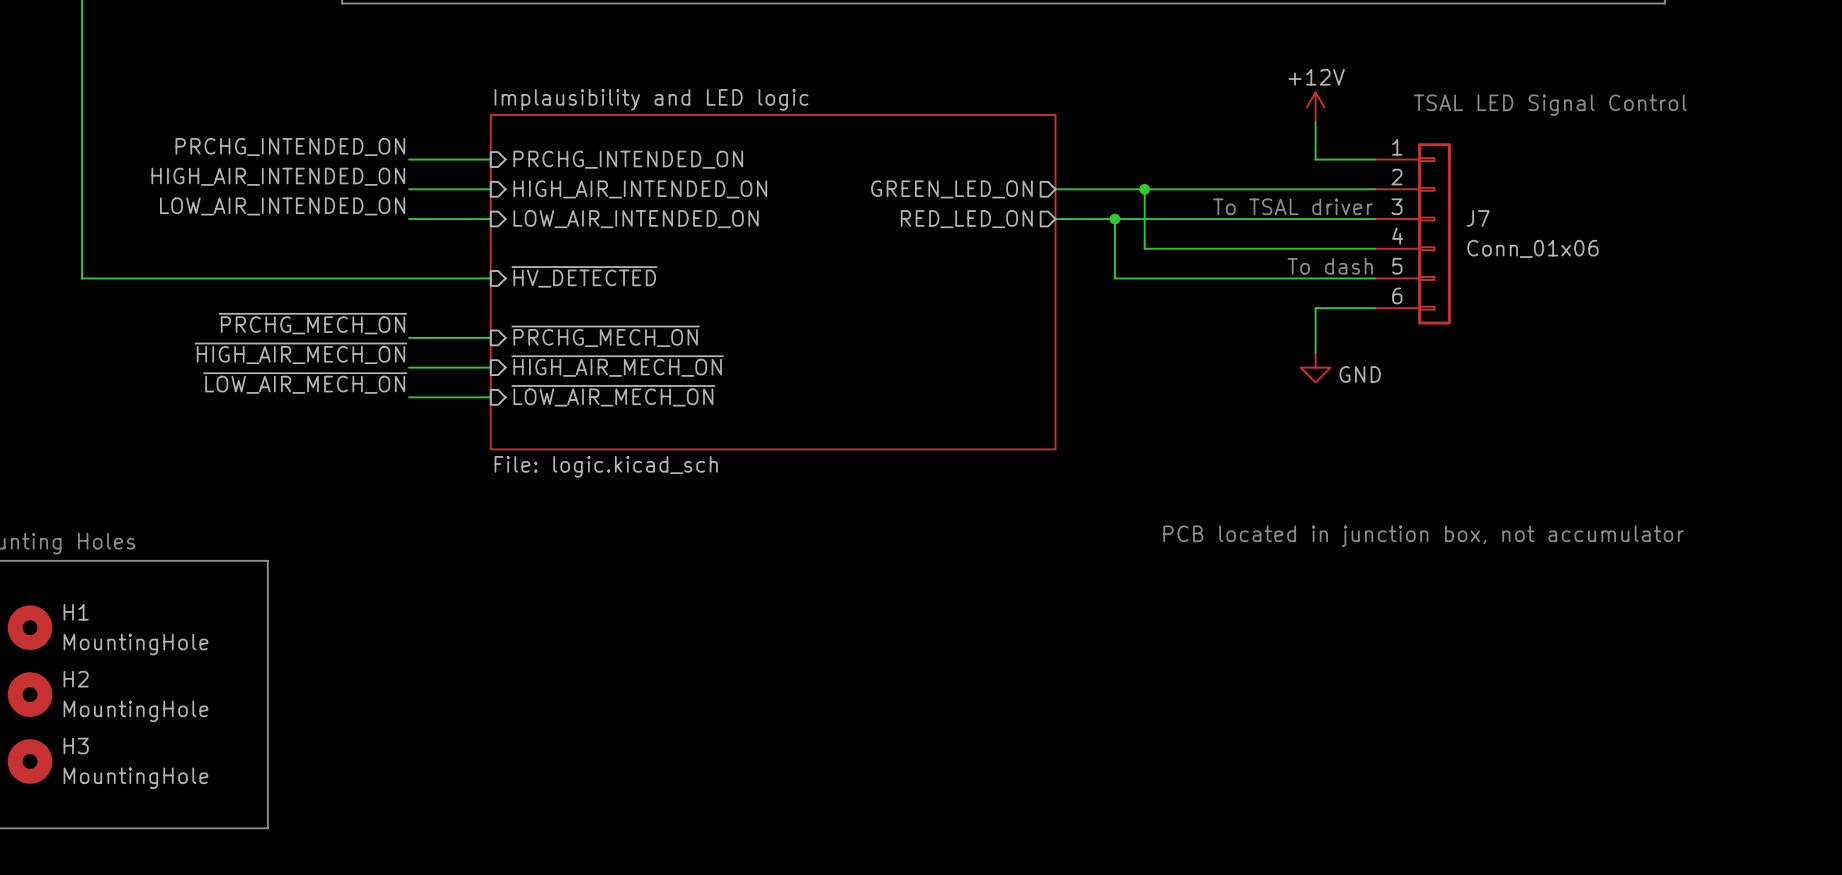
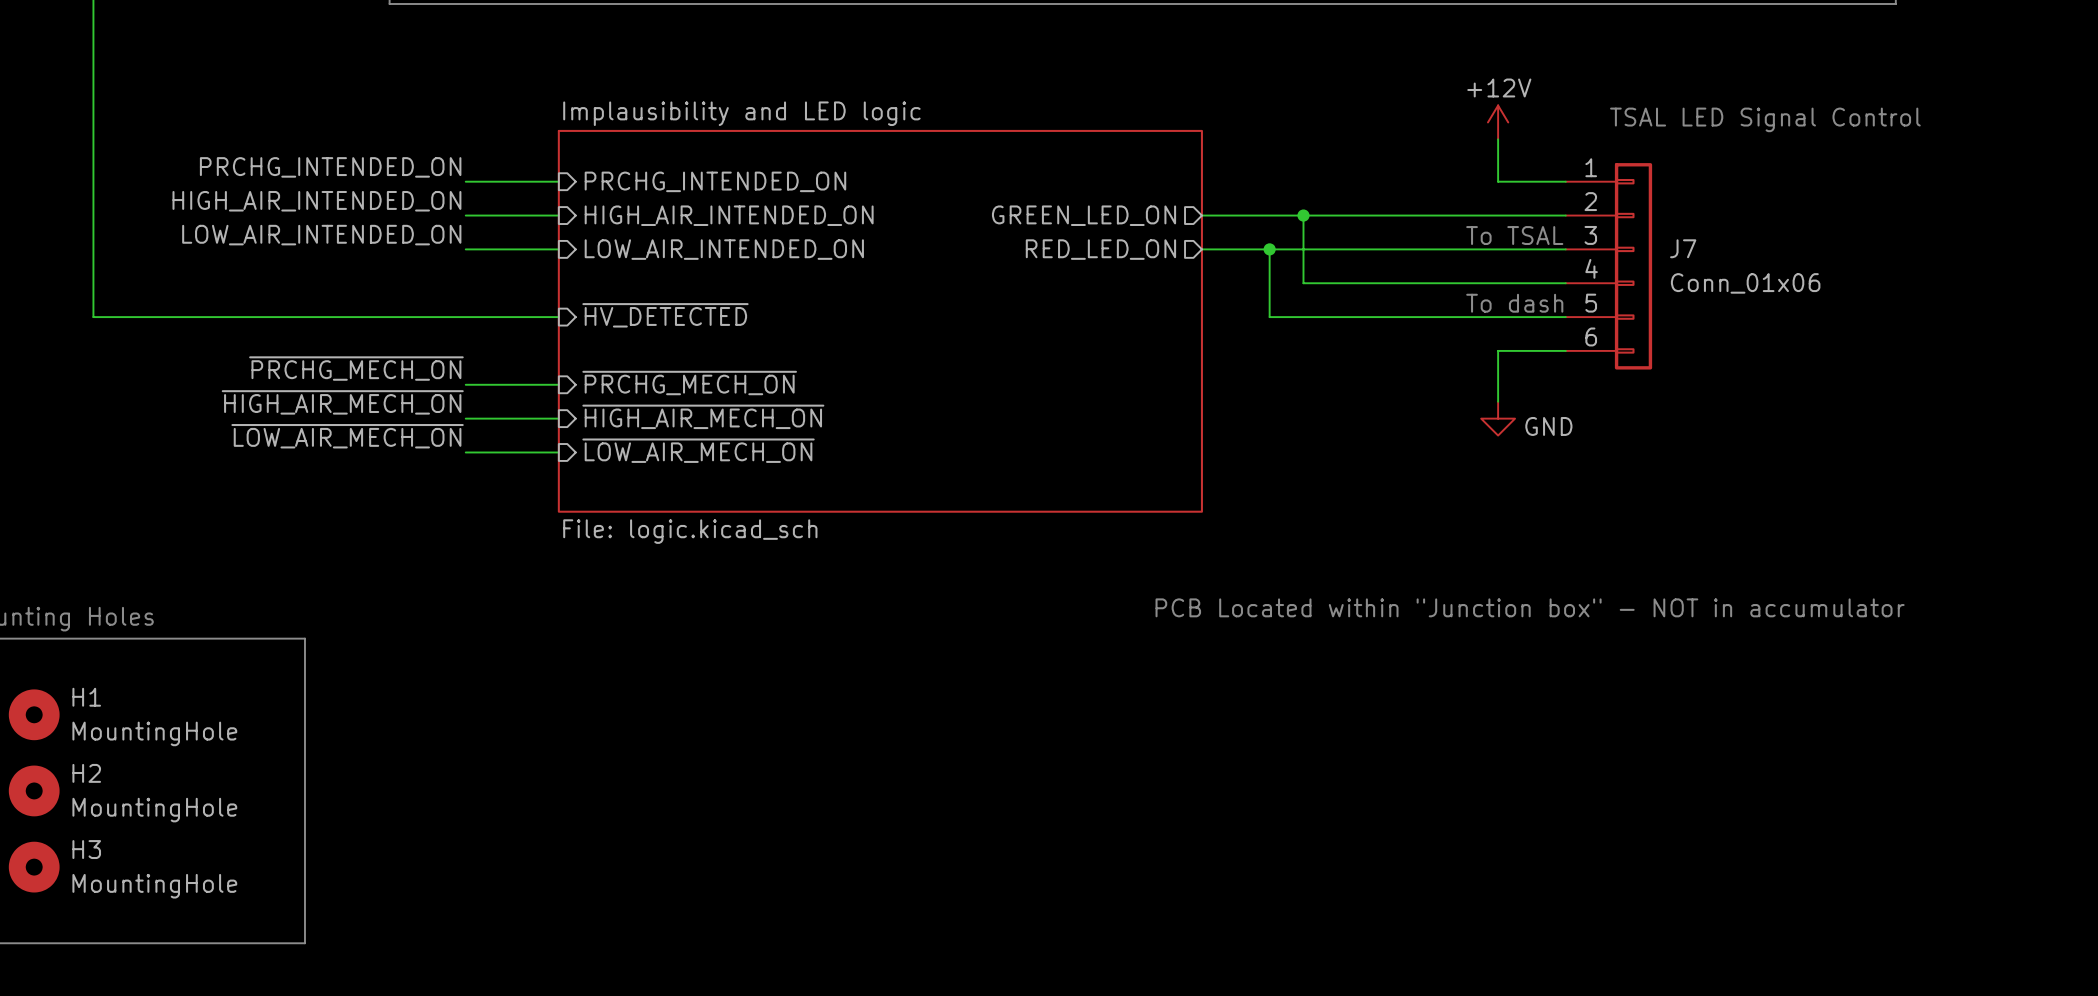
text: To TSAL driver (1293, 206) -> To TSAL (1514, 235)
text: PCB located in junction box, not accumulator (1423, 536) -> PCB Located within "Junction box" - NOT in accumulator (1530, 607)

